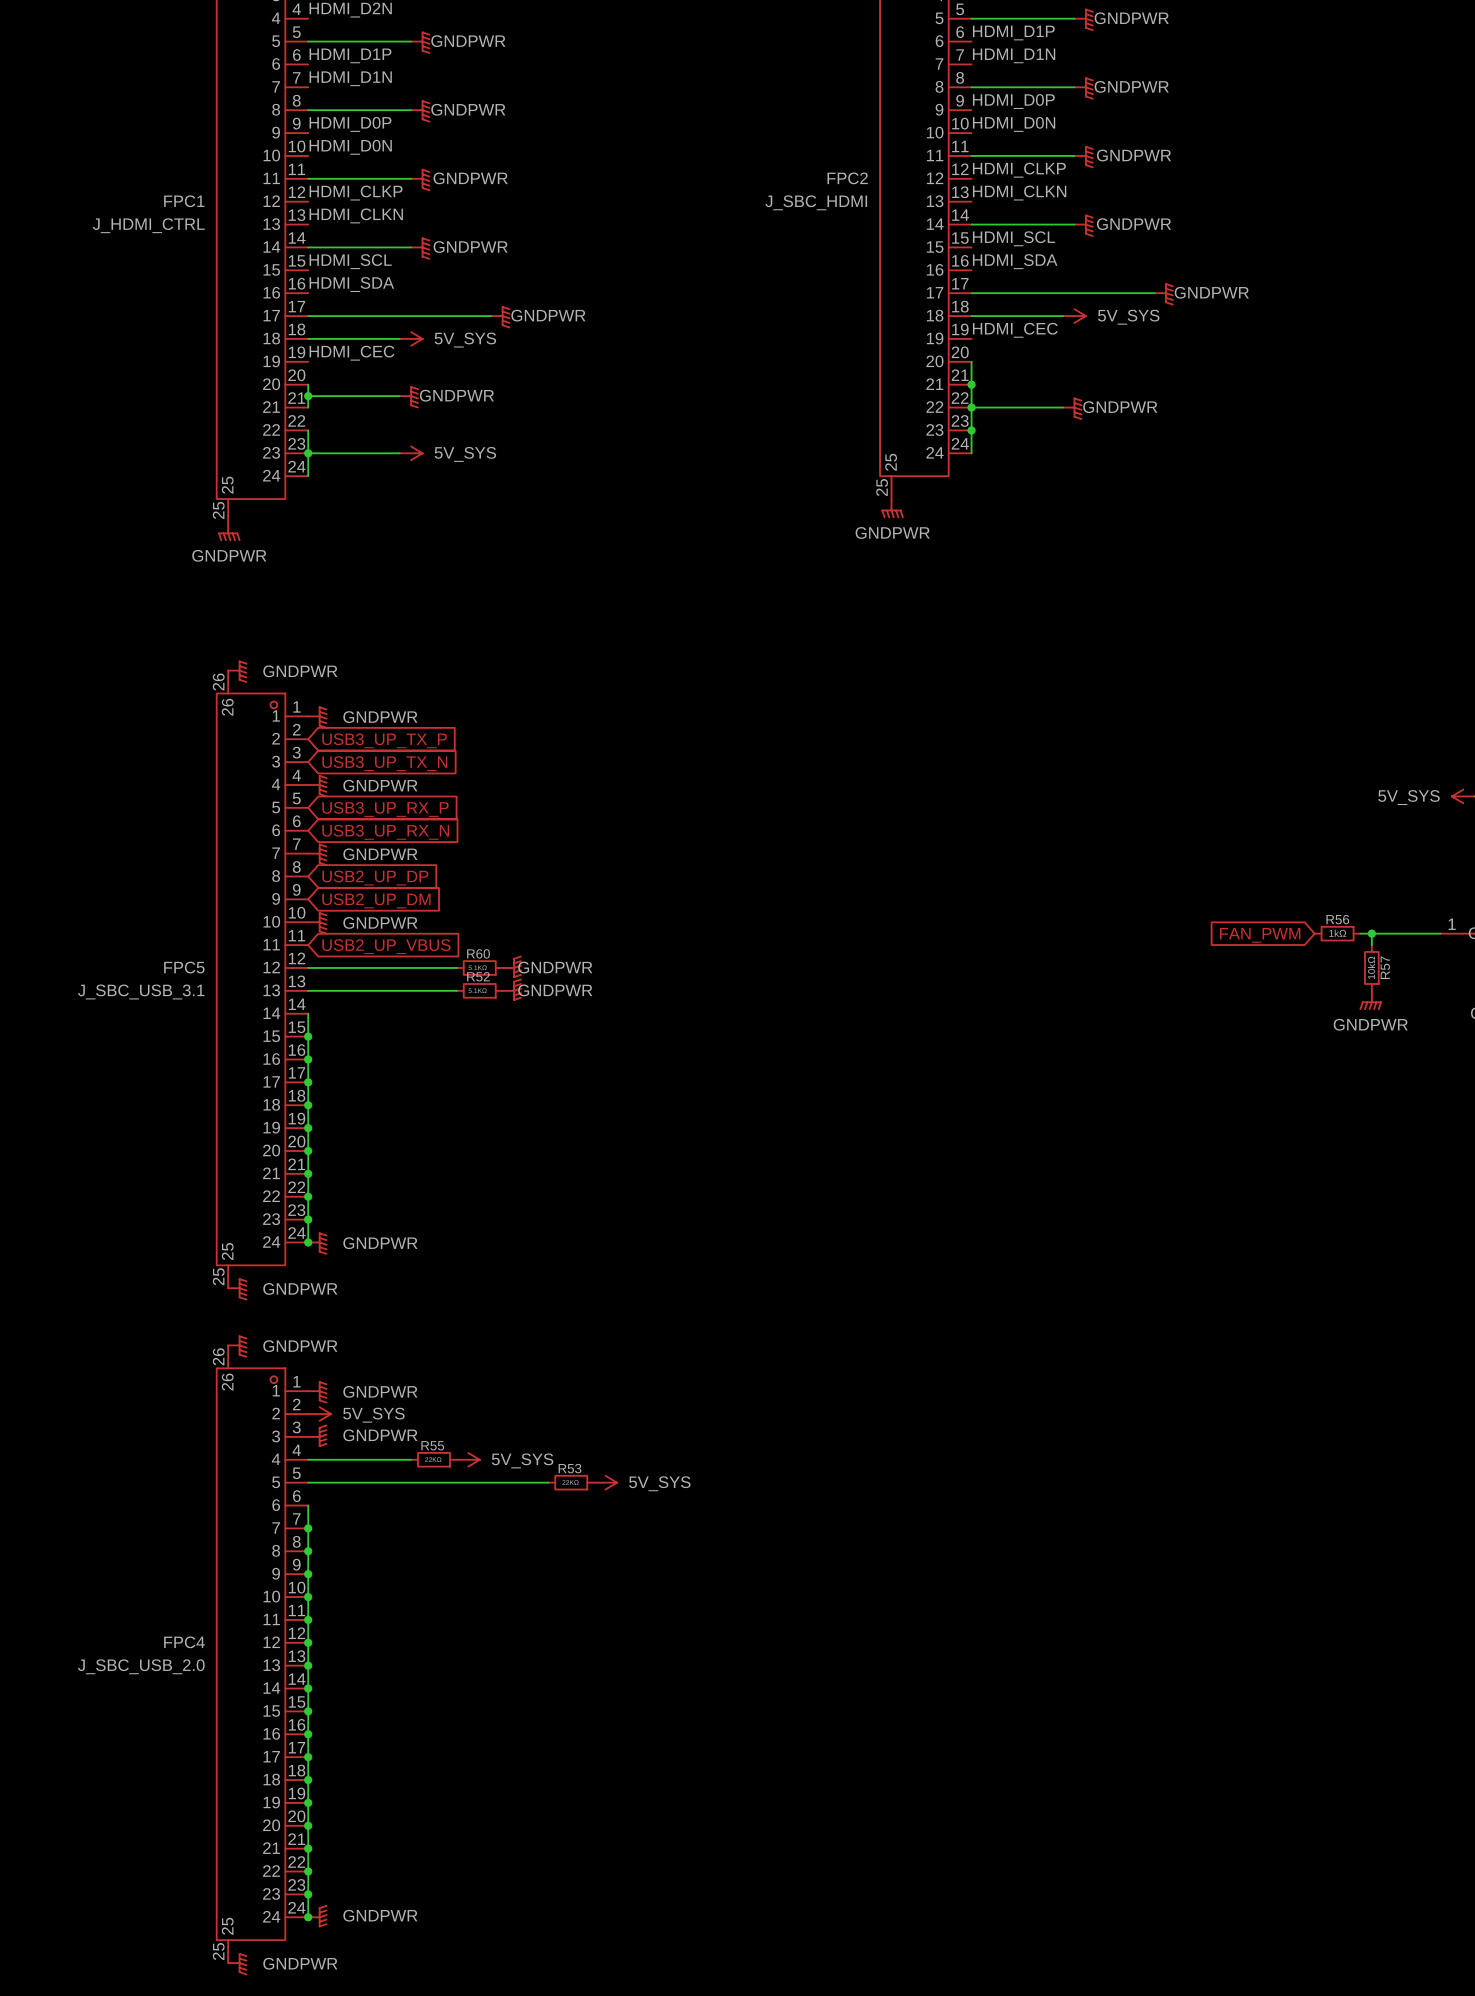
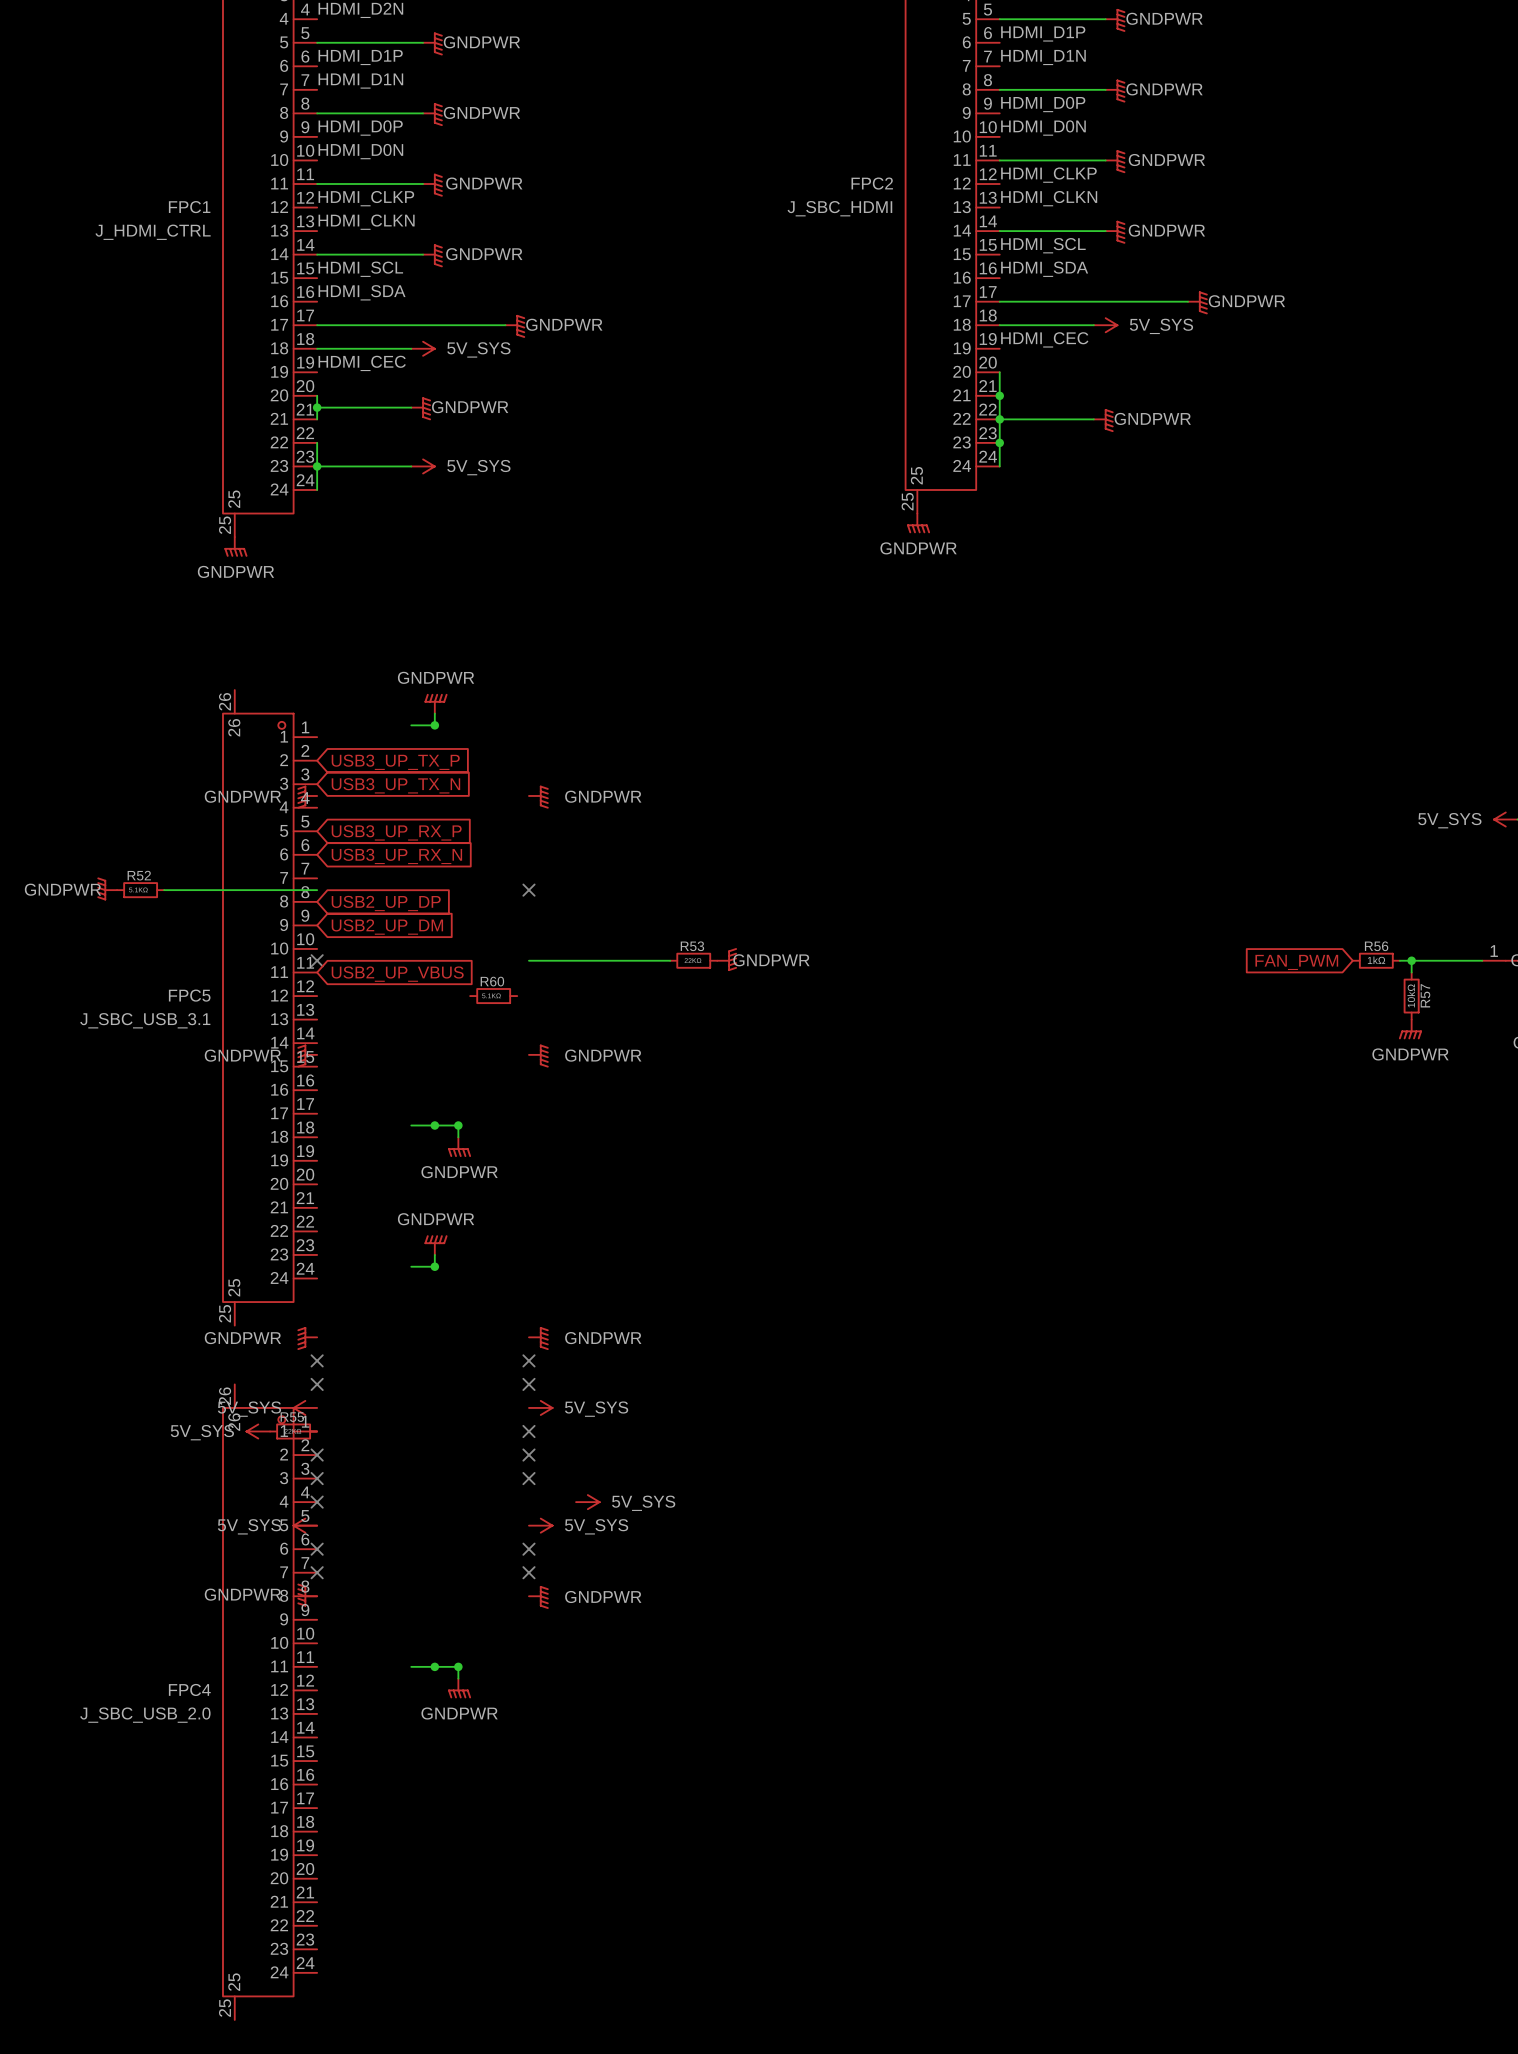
power symbol: GNDPWR (237, 671) -> none
power symbol: none -> GNDPWR (436, 703)
wire: none -> (434, 713) (434, 725) (411, 725)
junction: none -> (434, 725)
power symbol: GNDPWR (317, 717) -> none
power symbol: none -> GNDPWR (307, 797)
power symbol: none -> GNDPWR (538, 797)
power symbol: GNDPWR (317, 786) -> none
power symbol: GNDPWR (317, 854) -> none
power symbol: none -> GNDPWR (107, 888)
no-connect mark: none -> (528, 890)
power symbol: GNDPWR (317, 923) -> none
power symbol: none -> GNDPWR (727, 959)
no-connect mark: none -> (317, 960)
wire: none -> (528, 960) (670, 960)
power symbol: GNDPWR (512, 966) -> none
wire: (308, 967) (456, 967) -> (164, 890) (317, 890)
power symbol: GNDPWR (512, 989) -> none
wire: (308, 990) (456, 990) -> none
R52 position: (479, 990) -> (140, 890)
wire: (308, 1013) (308, 1242) -> none
power symbol: none -> GNDPWR (307, 1056)
power symbol: none -> GNDPWR (538, 1056)
junction: (308, 1036) -> none
junction: (308, 1059) -> none
junction: (308, 1082) -> none
wire: none -> (411, 1125) (458, 1125) (458, 1137)
junction: none -> (434, 1125)
junction: none -> (458, 1125)
junction: (308, 1105) -> none
power symbol: none -> GNDPWR (459, 1147)
junction: (308, 1128) -> none
junction: (308, 1150) -> none
junction: (308, 1173) -> none
junction: (308, 1196) -> none
power symbol: none -> GNDPWR (436, 1245)
junction: (308, 1219) -> none
wire: none -> (434, 1254) (434, 1266) (411, 1266)
junction: none -> (434, 1266)
junction: (308, 1242) -> none
power symbol: GNDPWR (317, 1243) -> none
power symbol: GNDPWR (237, 1289) -> none
power symbol: none -> GNDPWR (307, 1338)
power symbol: none -> GNDPWR (538, 1338)
no-connect mark: none -> (317, 1360)
no-connect mark: none -> (528, 1360)
no-connect mark: none -> (317, 1384)
no-connect mark: none -> (528, 1384)
power symbol: GNDPWR (237, 1346) -> none
power symbol: none -> 5V_SYS (305, 1407)
power symbol: none -> 5V_SYS (540, 1407)
power symbol: none -> 5V_SYS (258, 1431)
no-connect mark: none -> (528, 1431)
power symbol: GNDPWR (317, 1392) -> none
no-connect mark: none -> (317, 1455)
power symbol: 5V_SYS (319, 1414) -> none
no-connect mark: none -> (528, 1455)
power symbol: GNDPWR (317, 1435) -> none
no-connect mark: none -> (317, 1478)
no-connect mark: none -> (528, 1478)
wire: (308, 1459) (411, 1459) -> none
no-connect mark: none -> (317, 1502)
R55 position: (434, 1459) -> (293, 1431)
power symbol: 5V_SYS (468, 1459) -> none
power symbol: none -> 5V_SYS (587, 1502)
power symbol: none -> 5V_SYS (305, 1525)
wire: (308, 1482) (548, 1482) -> none
power symbol: none -> 5V_SYS (540, 1525)
R53 position: (571, 1482) -> (693, 960)
power symbol: 5V_SYS (605, 1482) -> none
wire: (308, 1505) (308, 1917) -> none
no-connect mark: none -> (317, 1549)
no-connect mark: none -> (528, 1549)
junction: (308, 1528) -> none
no-connect mark: none -> (317, 1572)
no-connect mark: none -> (528, 1572)
power symbol: none -> GNDPWR (307, 1595)
junction: (308, 1551) -> none
power symbol: none -> GNDPWR (538, 1597)
junction: (308, 1574) -> none
junction: (308, 1597) -> none
junction: (308, 1619) -> none
wire: none -> (411, 1666) (458, 1666) (458, 1678)
junction: none -> (434, 1666)
junction: none -> (458, 1666)
power symbol: none -> GNDPWR (459, 1688)
junction: (308, 1642) -> none
junction: (308, 1665) -> none
junction: (308, 1688) -> none
junction: (308, 1711) -> none
junction: (308, 1734) -> none
junction: (308, 1757) -> none
junction: (308, 1780) -> none
junction: (308, 1802) -> none
junction: (308, 1825) -> none
junction: (308, 1848) -> none
junction: (308, 1871) -> none
junction: (308, 1894) -> none
power symbol: GNDPWR (317, 1916) -> none
junction: (308, 1917) -> none
power symbol: GNDPWR (237, 1964) -> none

